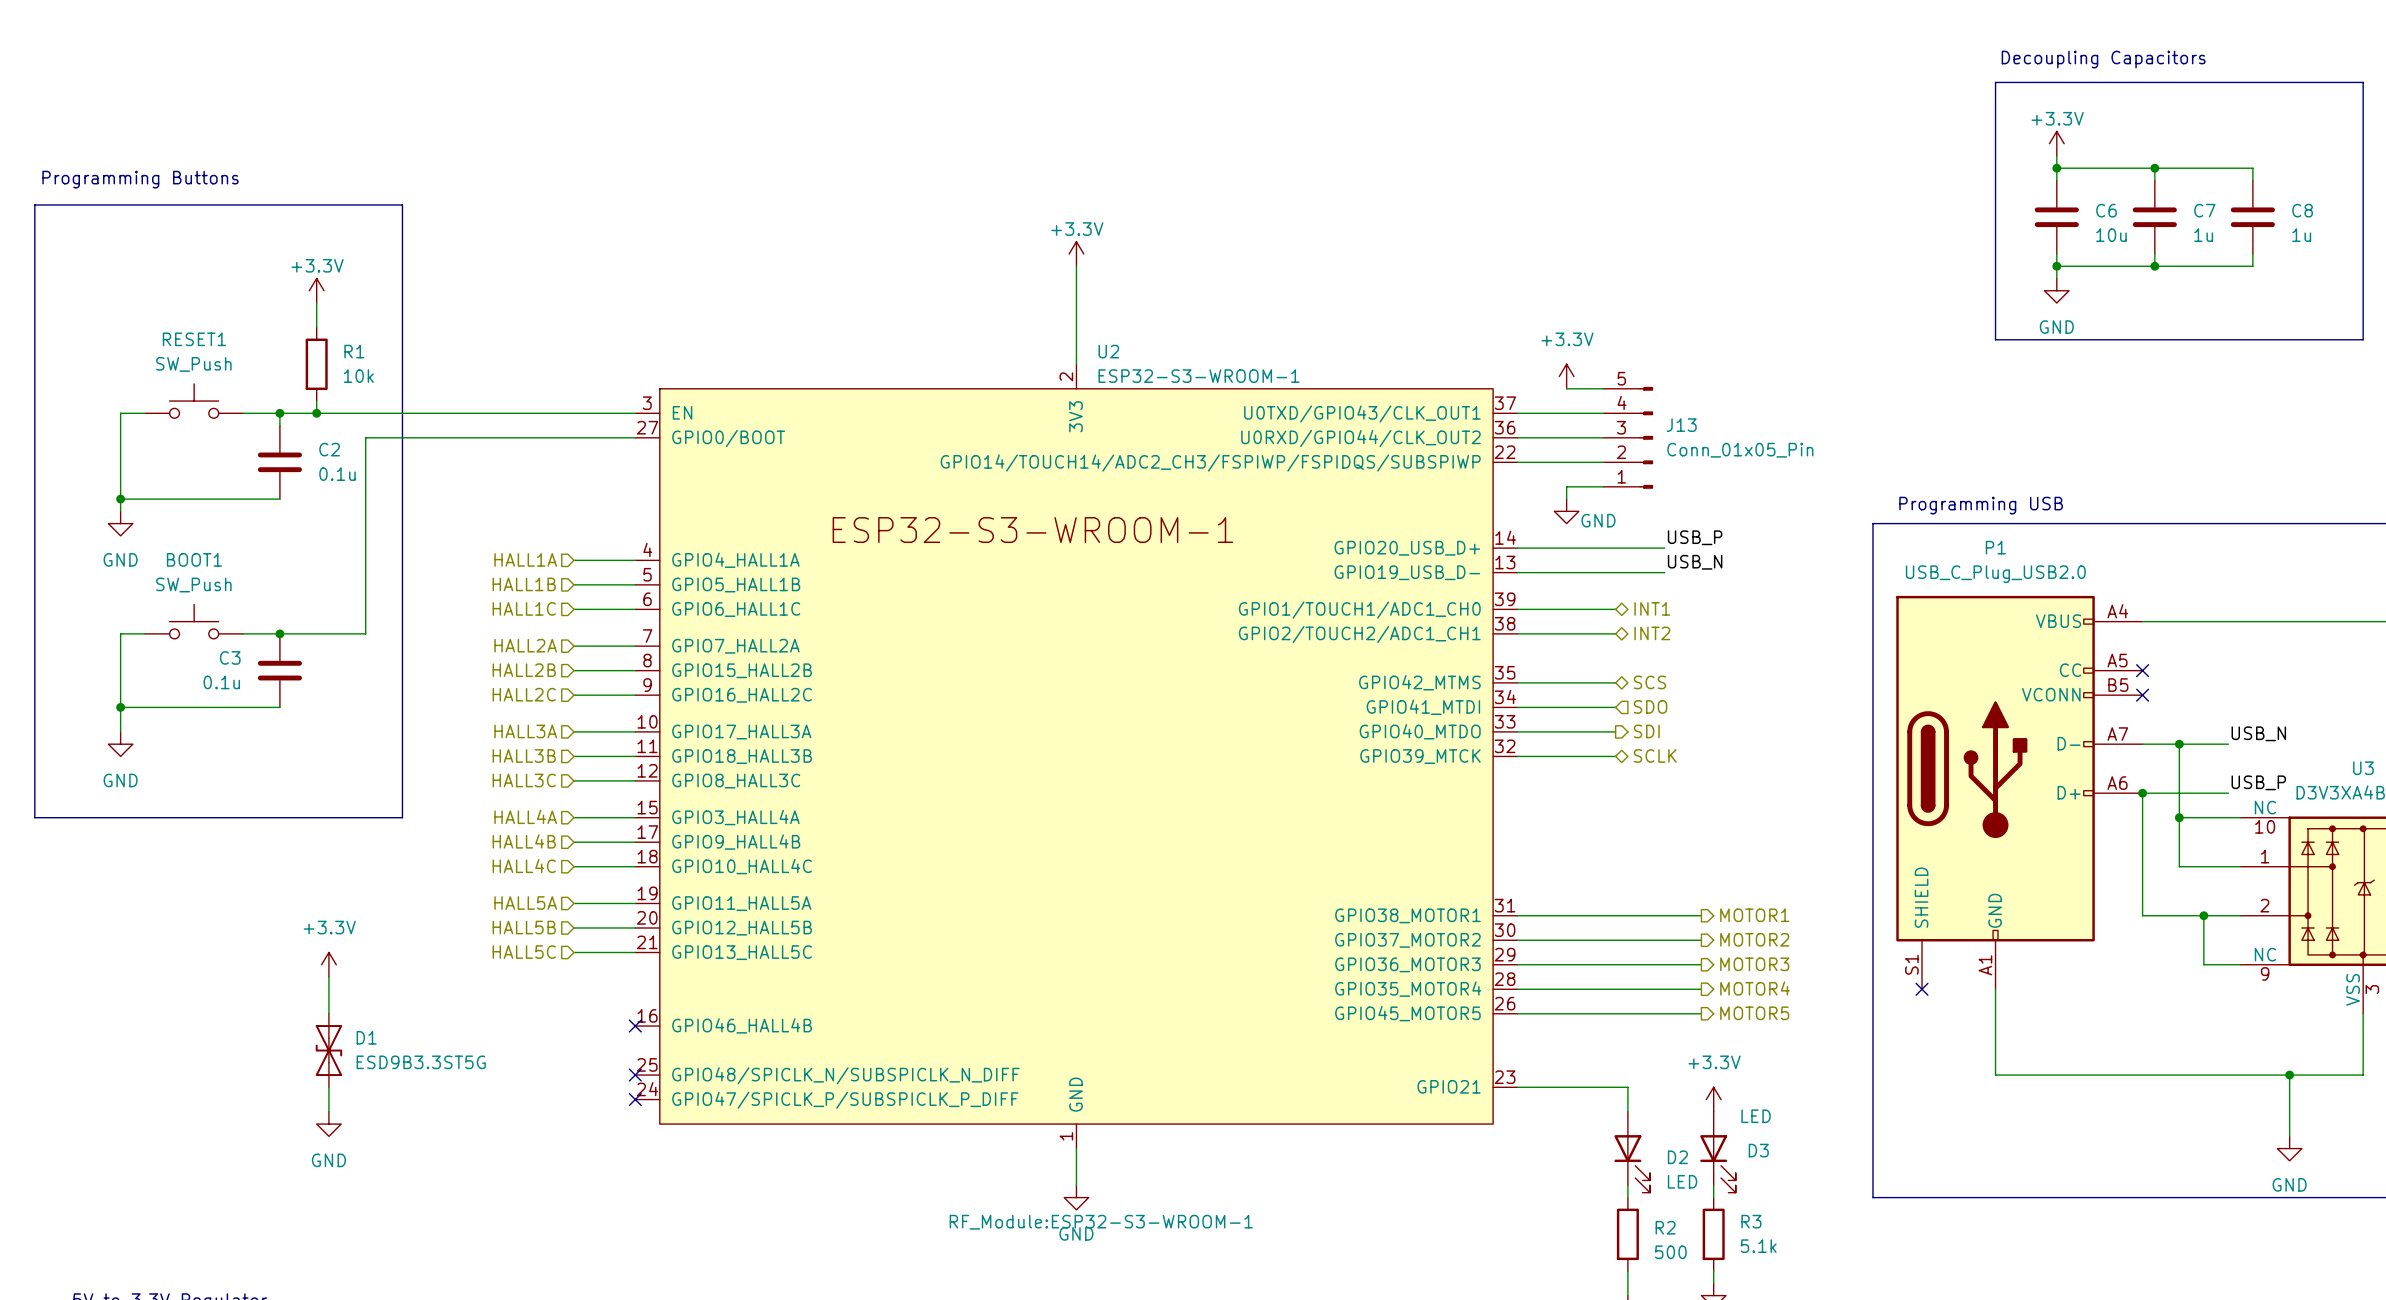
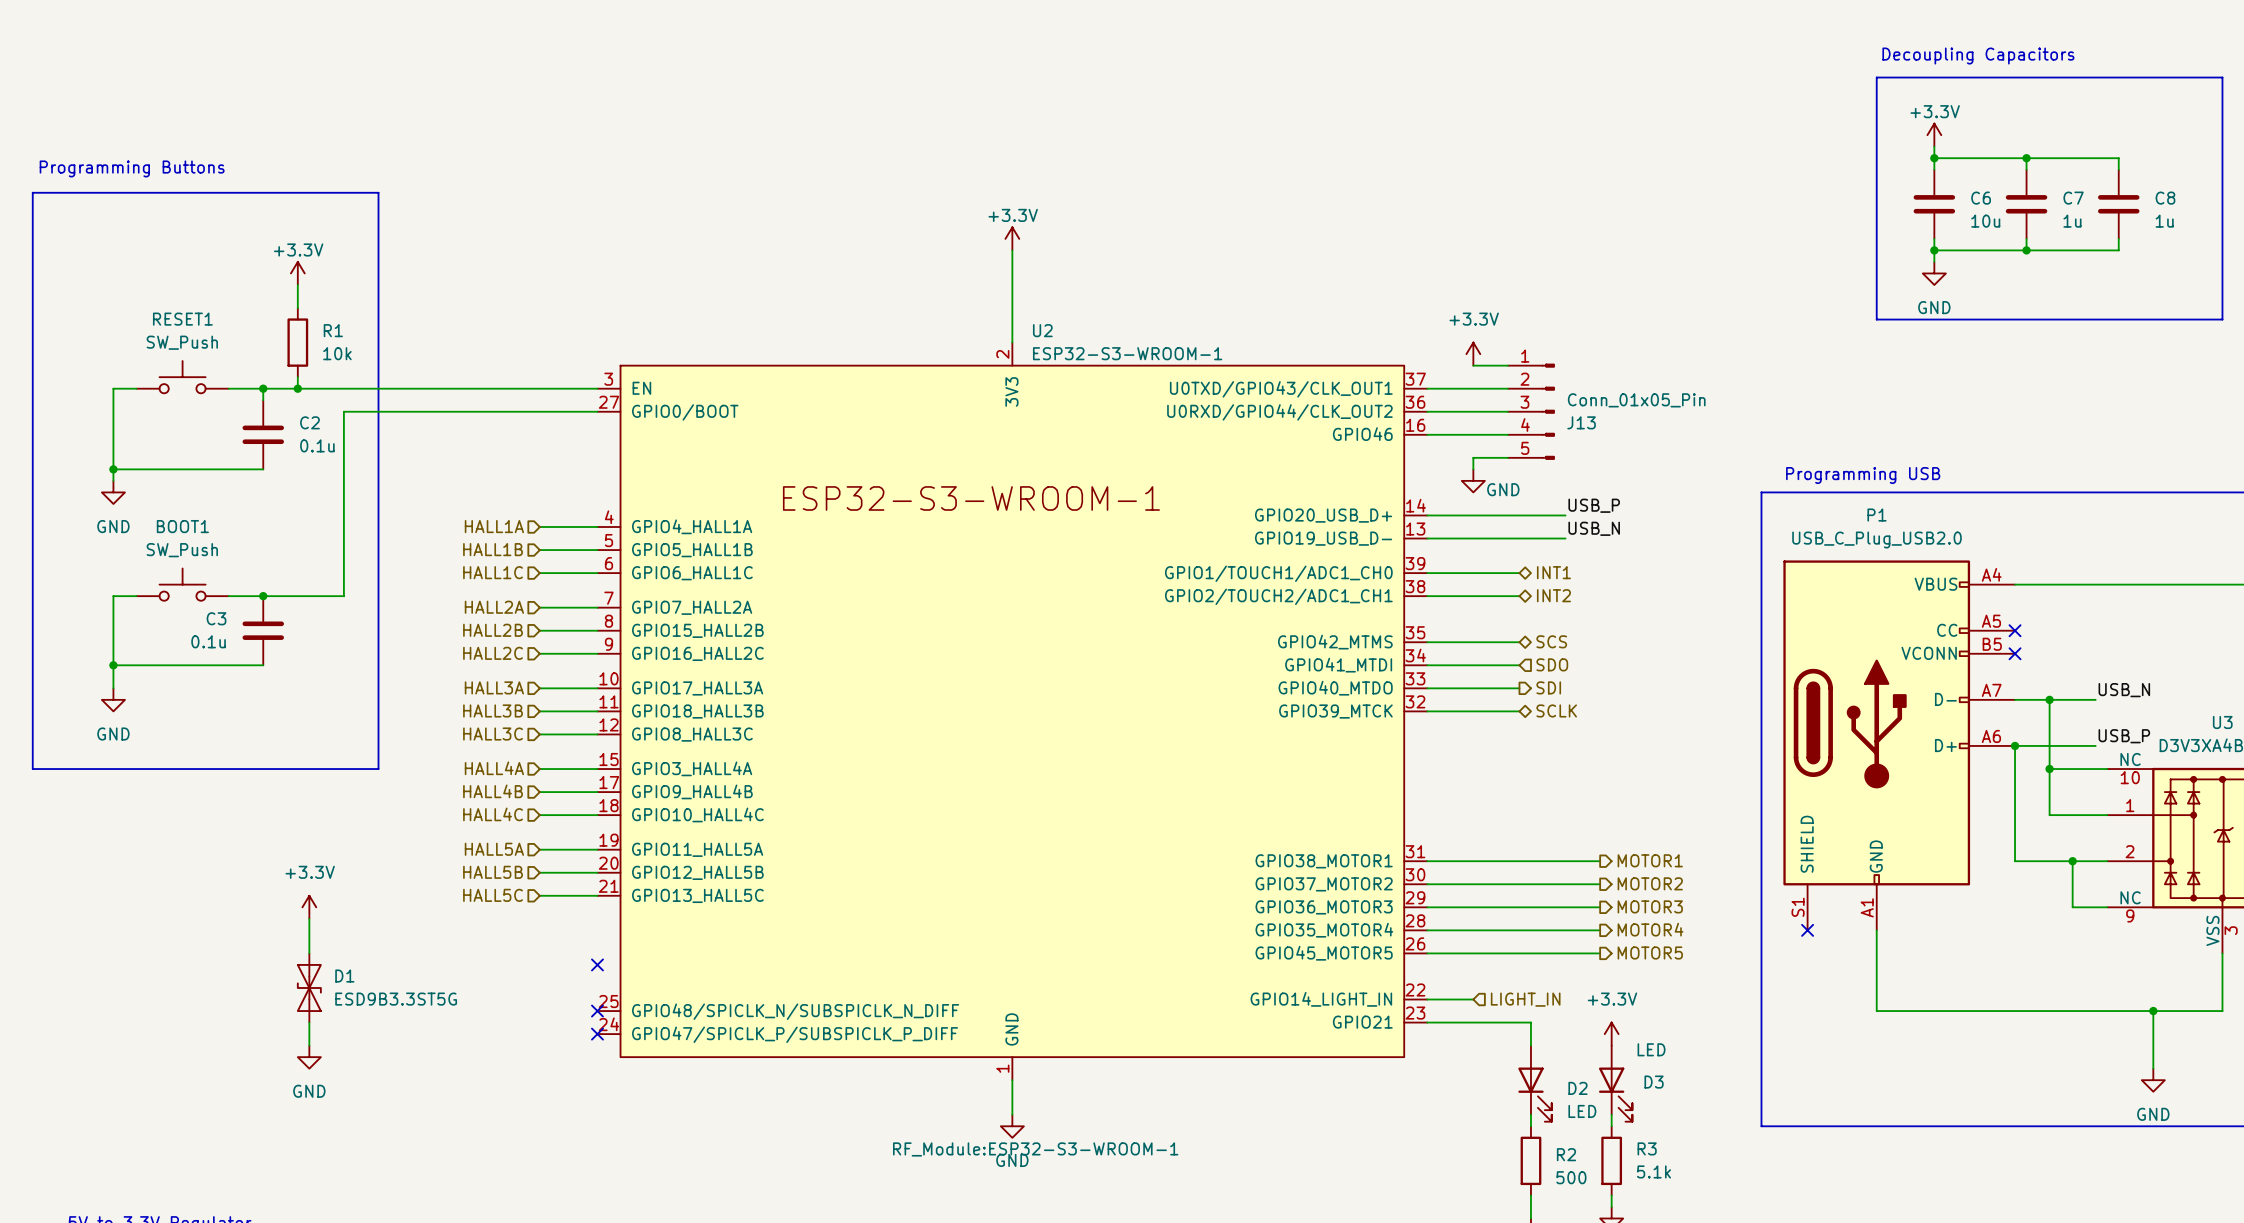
U2 symbol: [635, 364, 1518, 1149] -> [597, 342, 1428, 1081]
J13 flip: as is (1646, 437) -> up-down (1548, 411)
wire: none -> (1427, 999) (1473, 999)
hierarchical label: none -> LIGHT_IN (1525, 999)

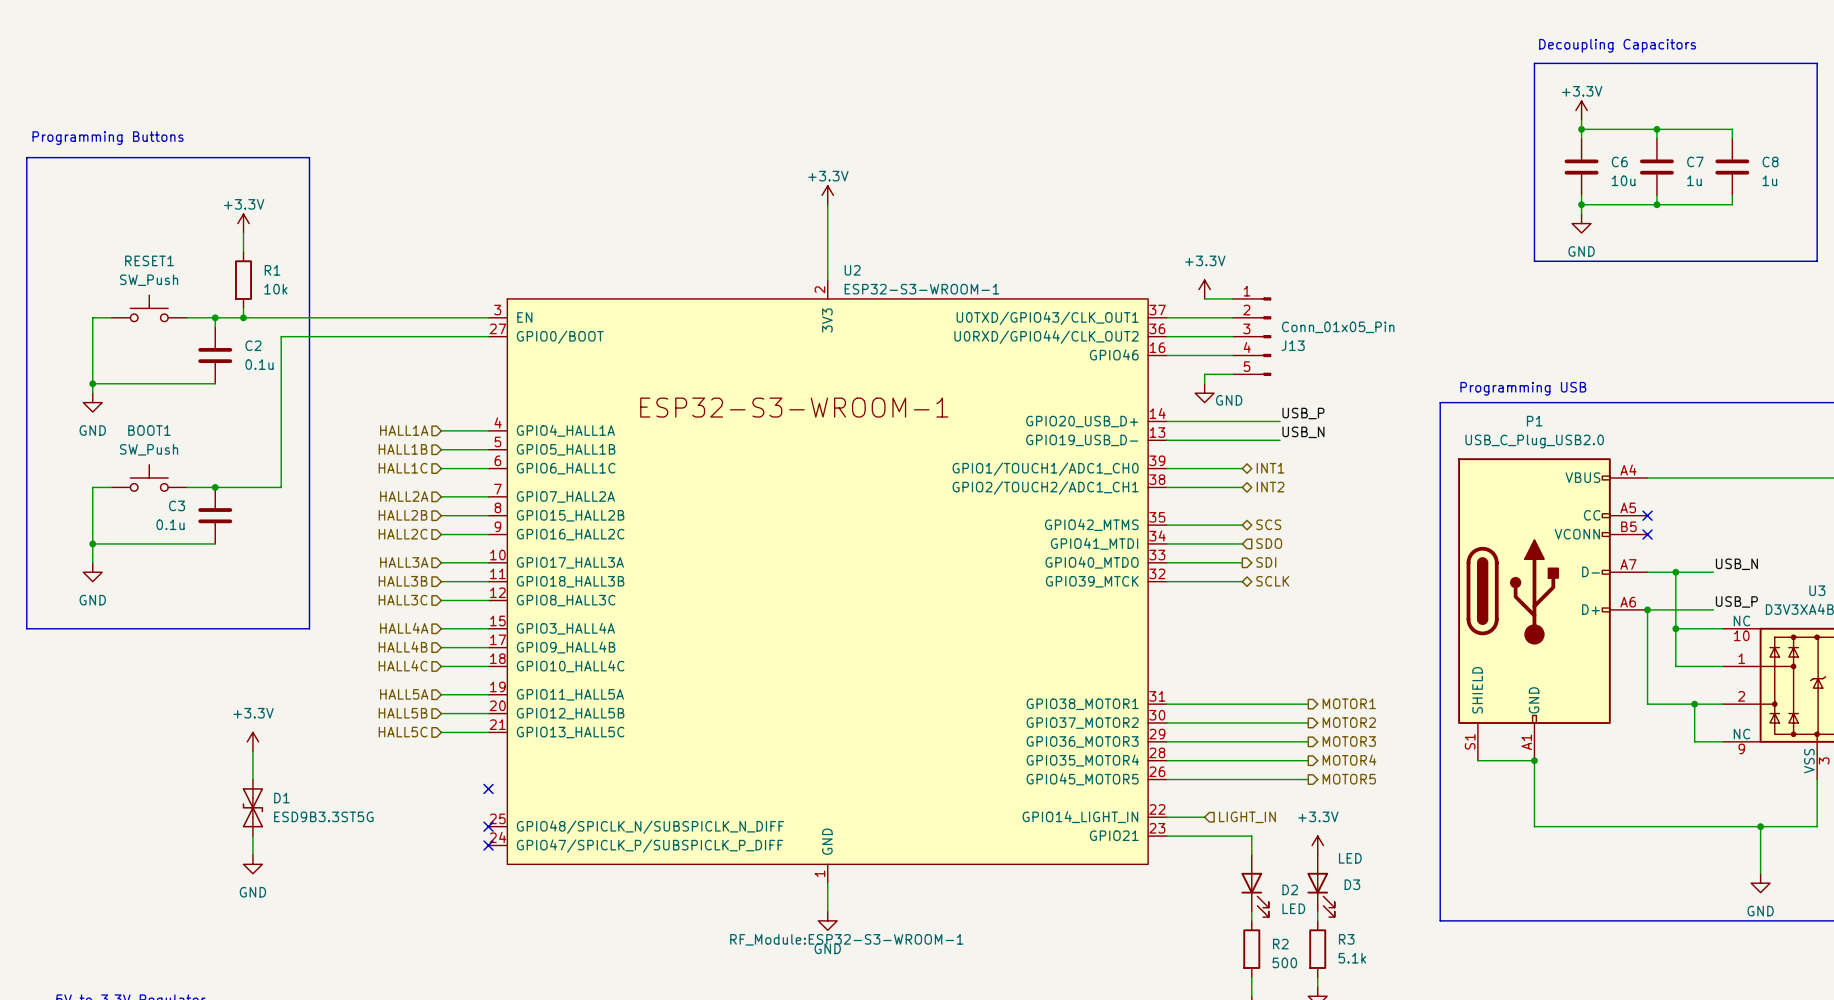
wire: none -> (1477, 760) (1534, 760)
no-connect mark: (1807, 930) -> none
junction: none -> (1534, 760)

